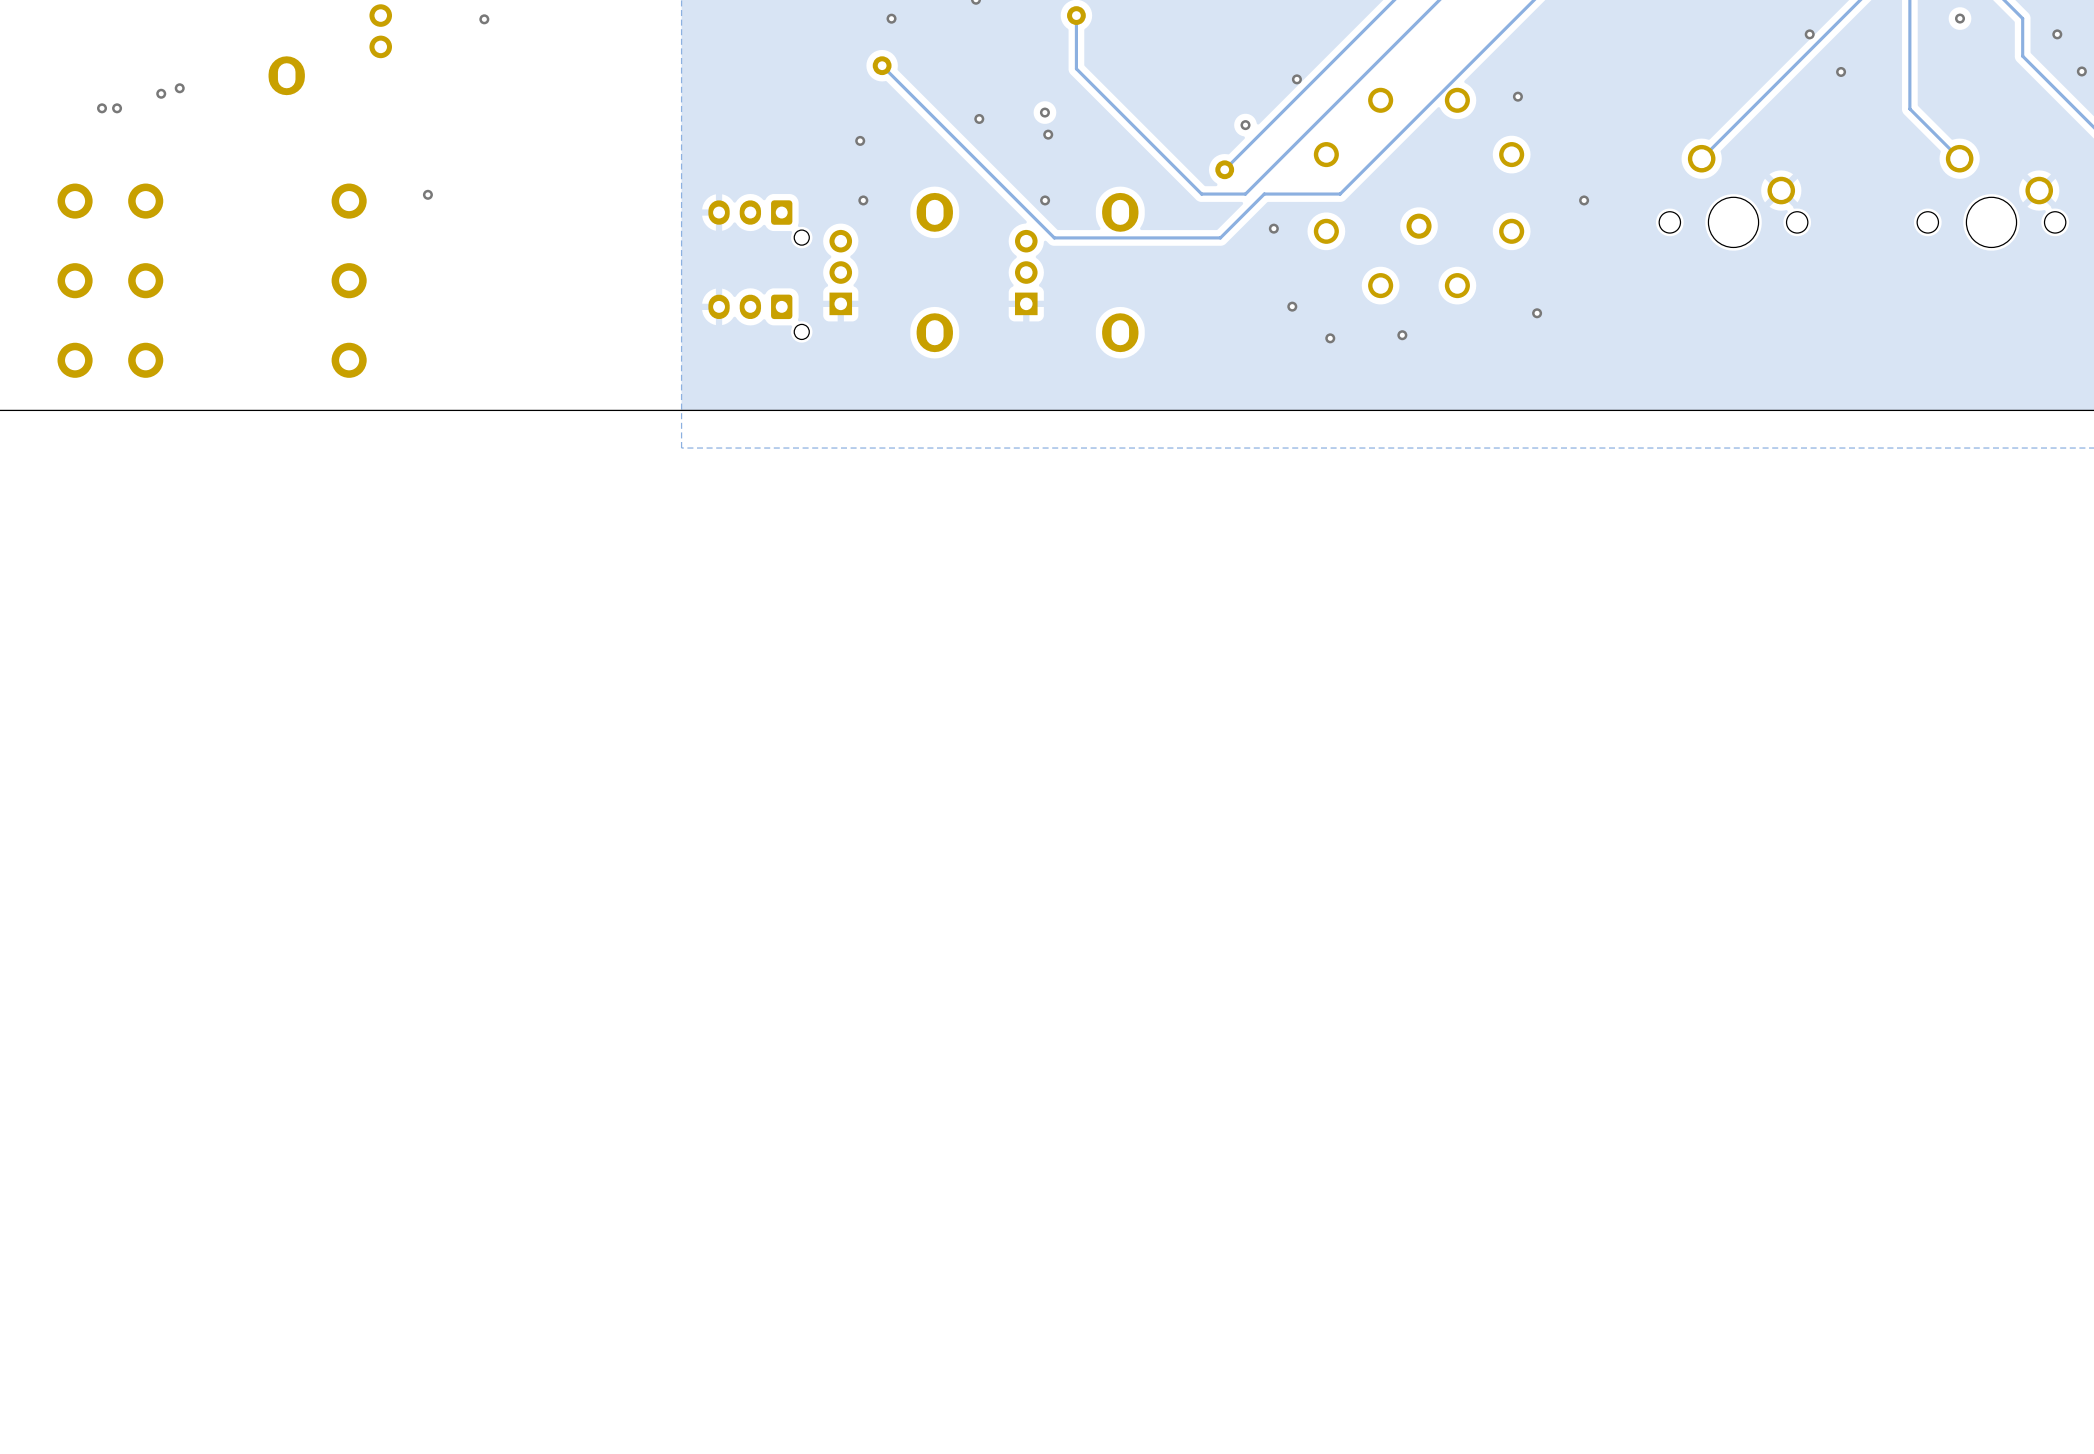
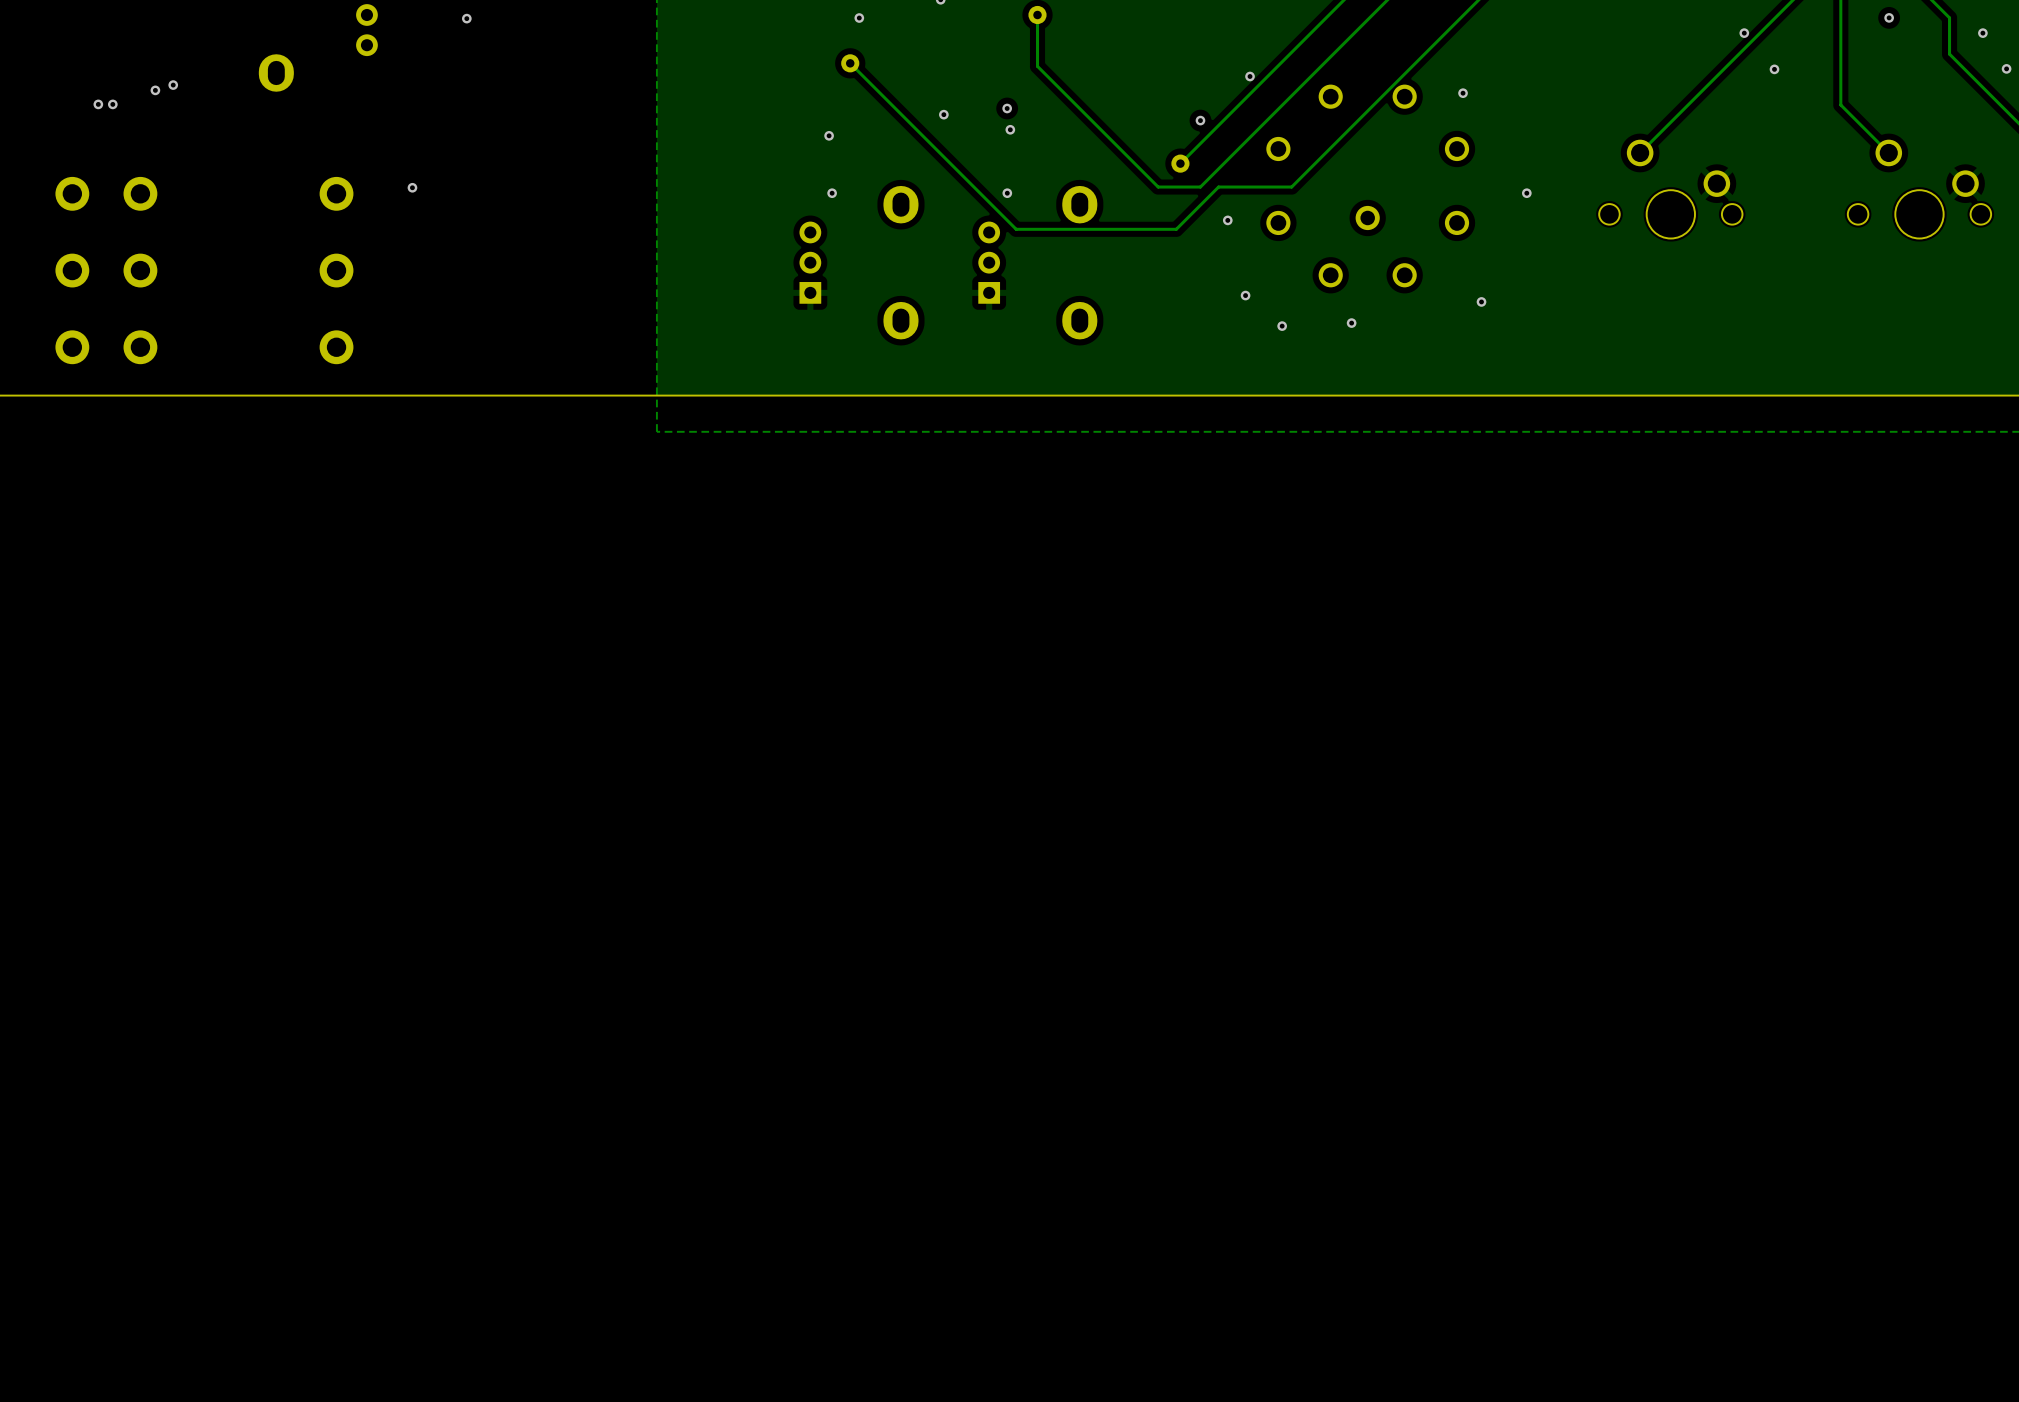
part: (758, 222) -> none
part: (758, 317) -> none

